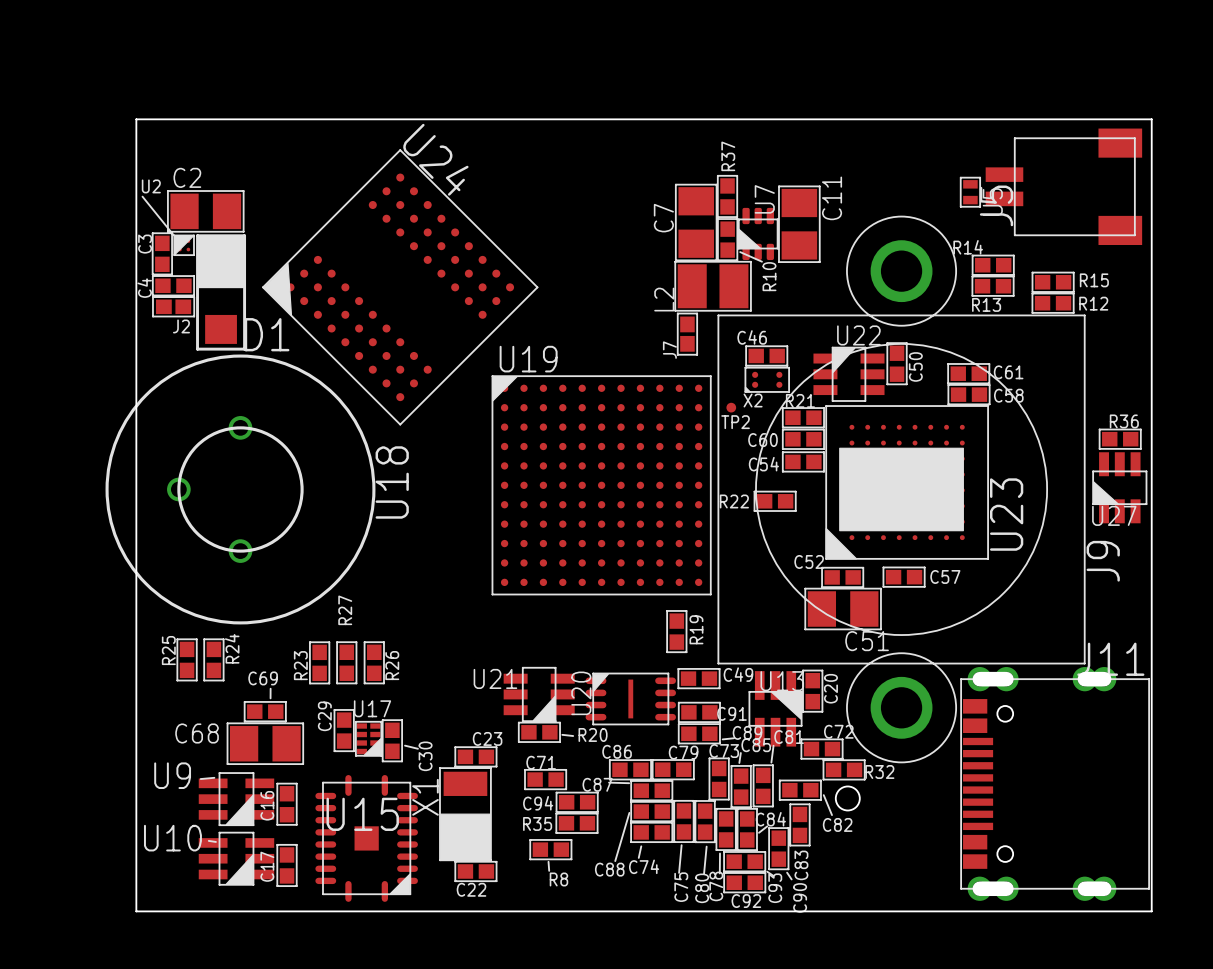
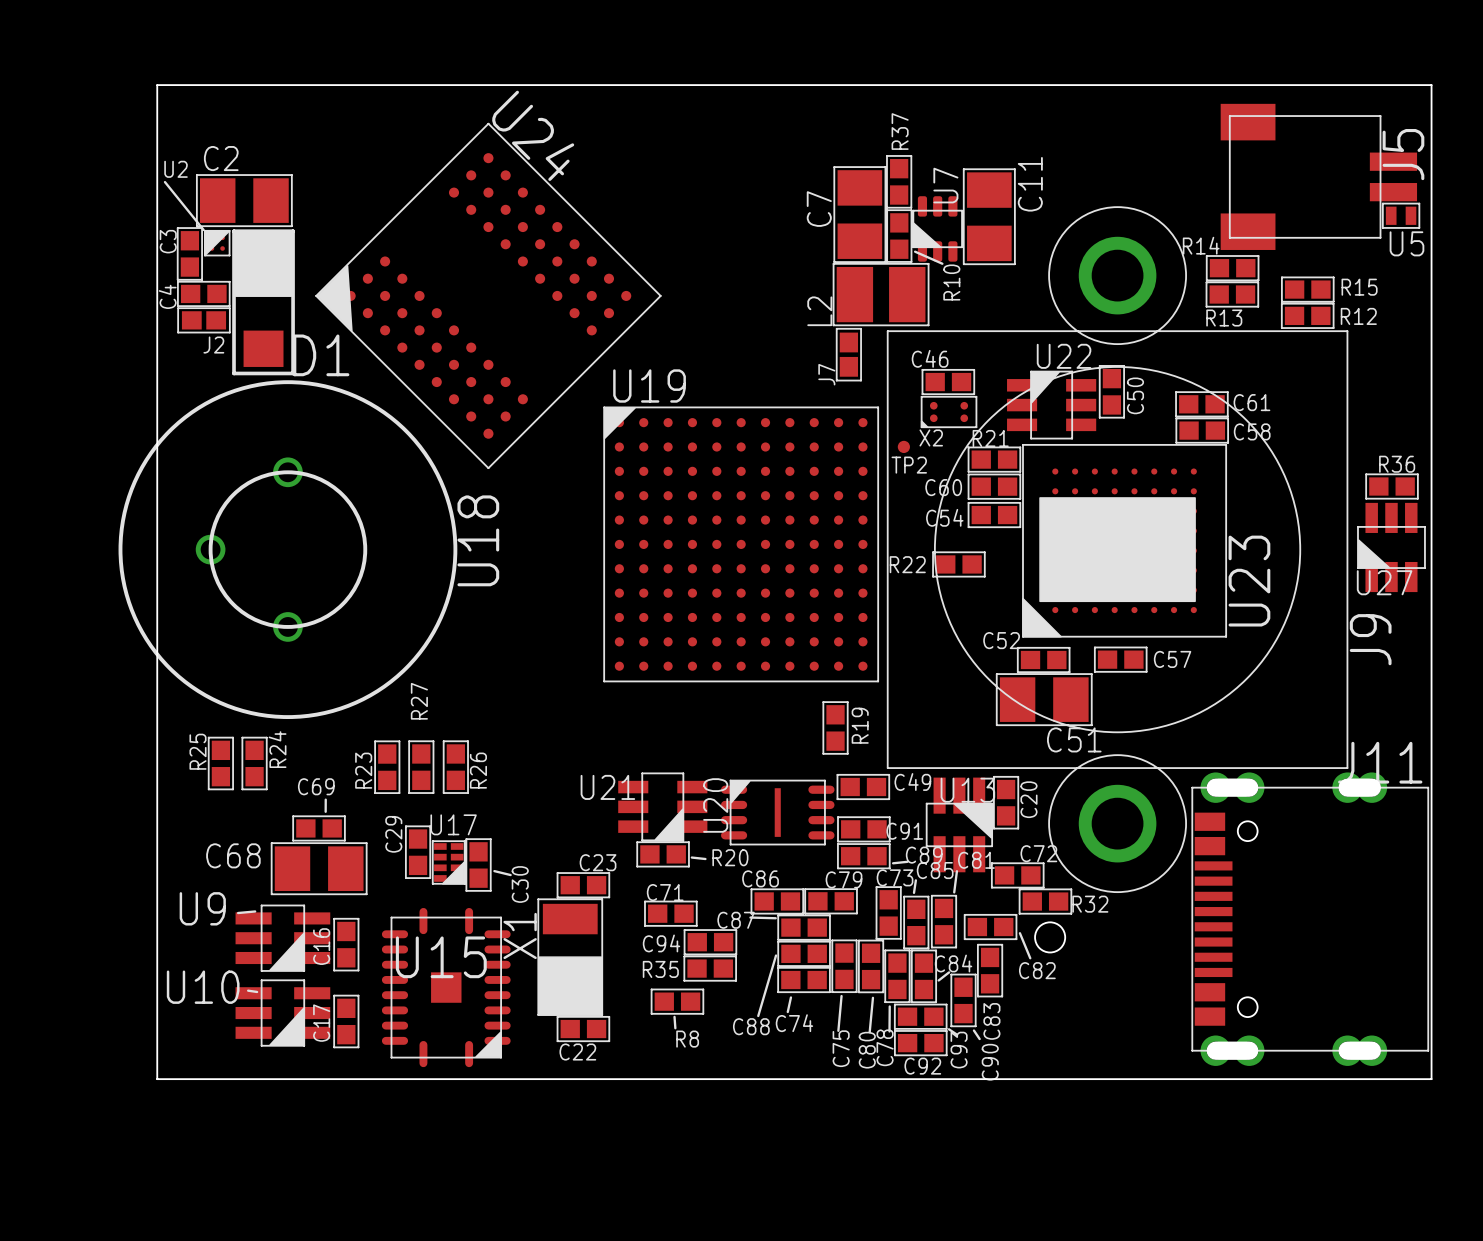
J5 rotation: 0° (1063, 186) -> 180° (1318, 176)
U5 rotation: 0° (970, 192) -> 90° clockwise (1401, 215)
U5 position: (970, 192) -> (1401, 215)

